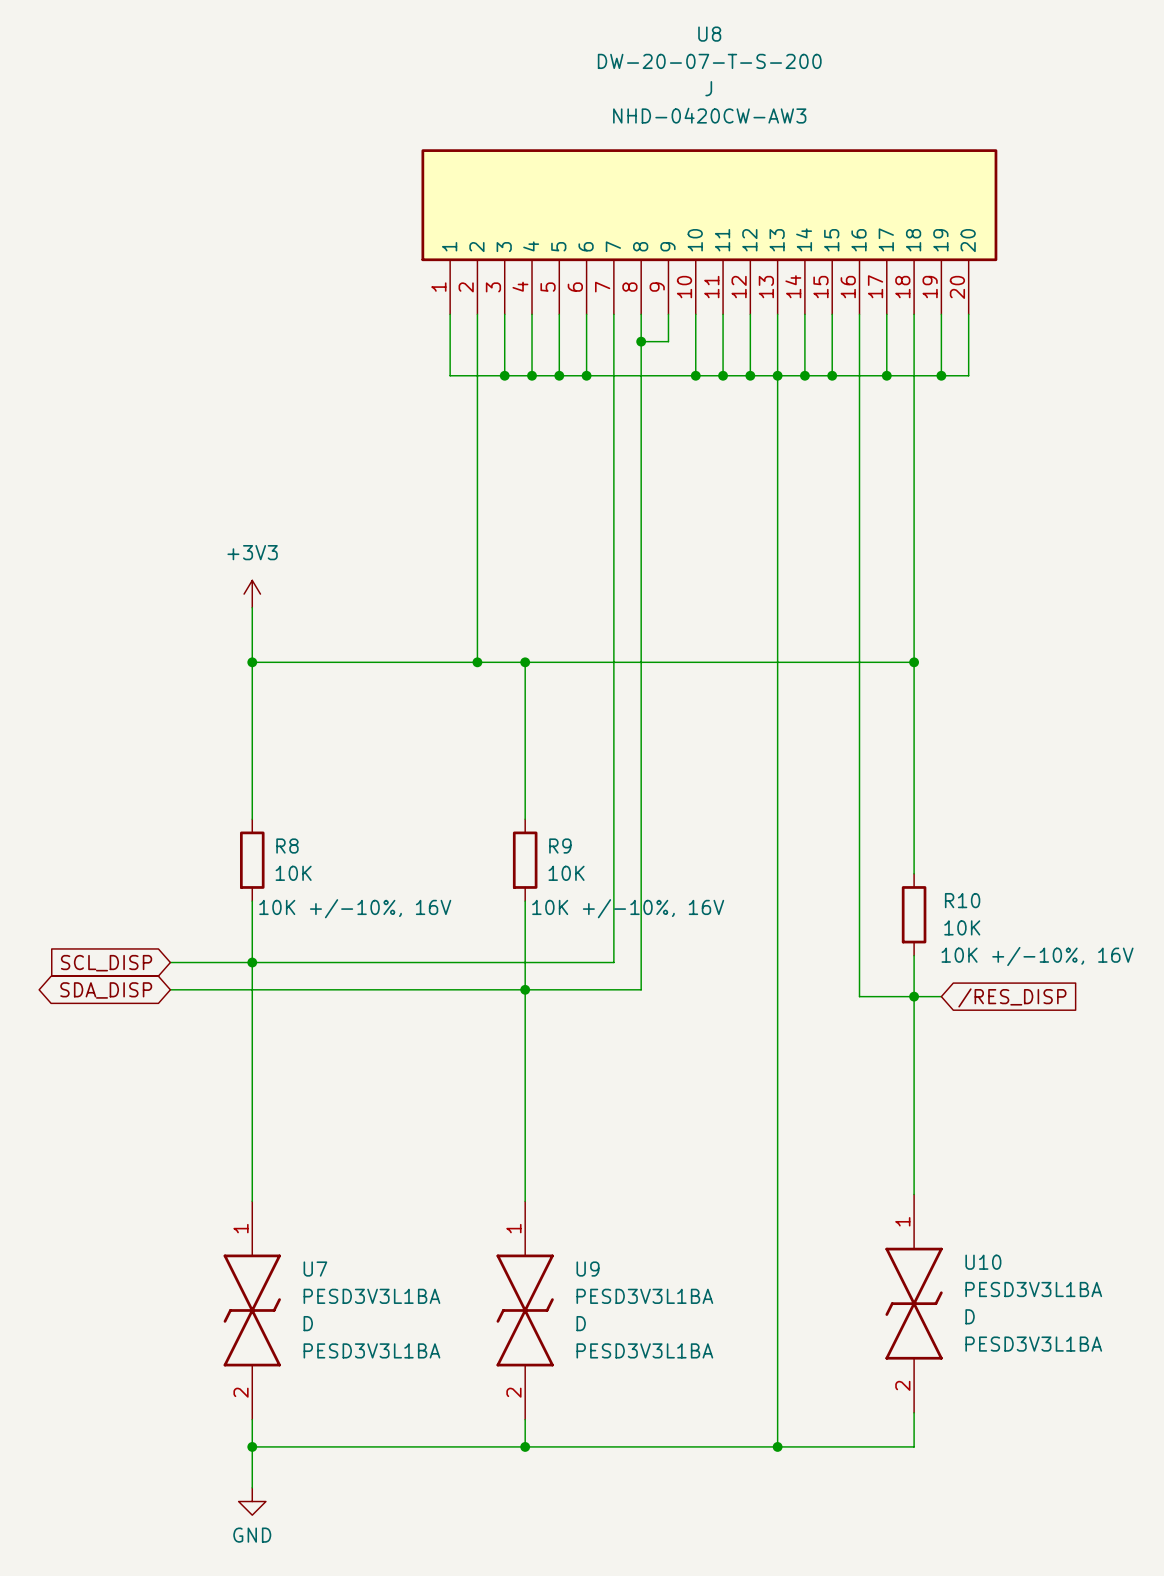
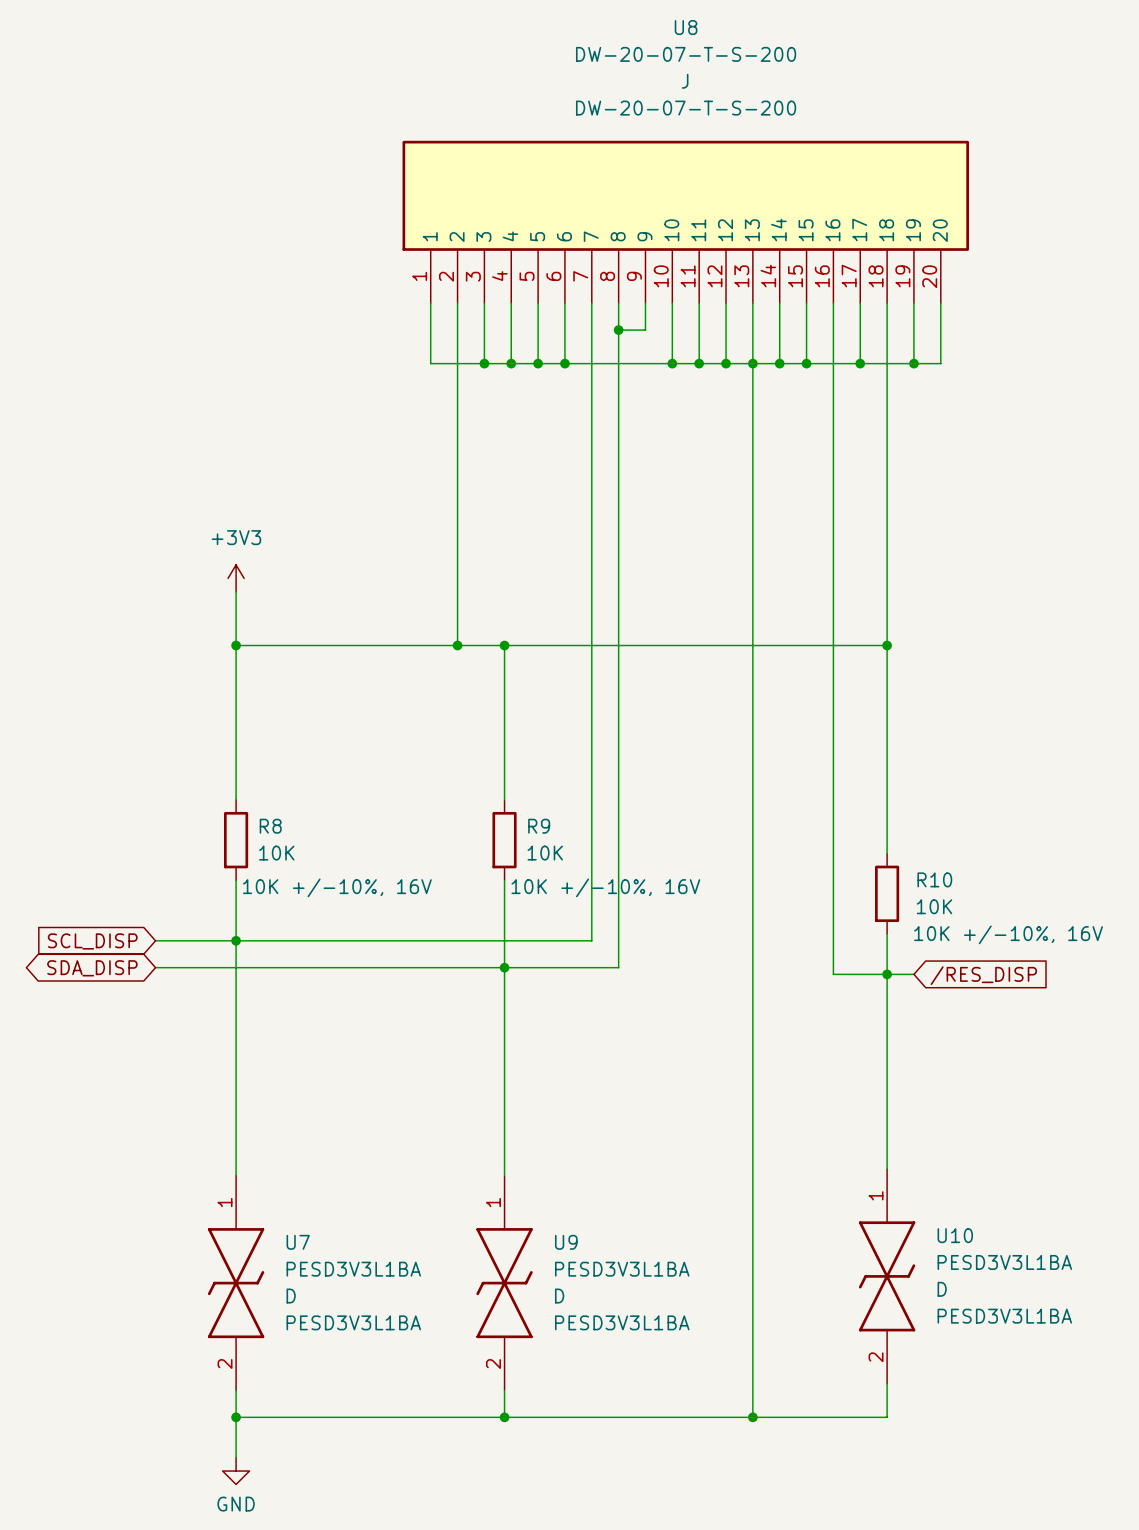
U8 text: NHD-0420CW-AW3 (709, 115) -> DW-20-07-T-S-200 (686, 108)

